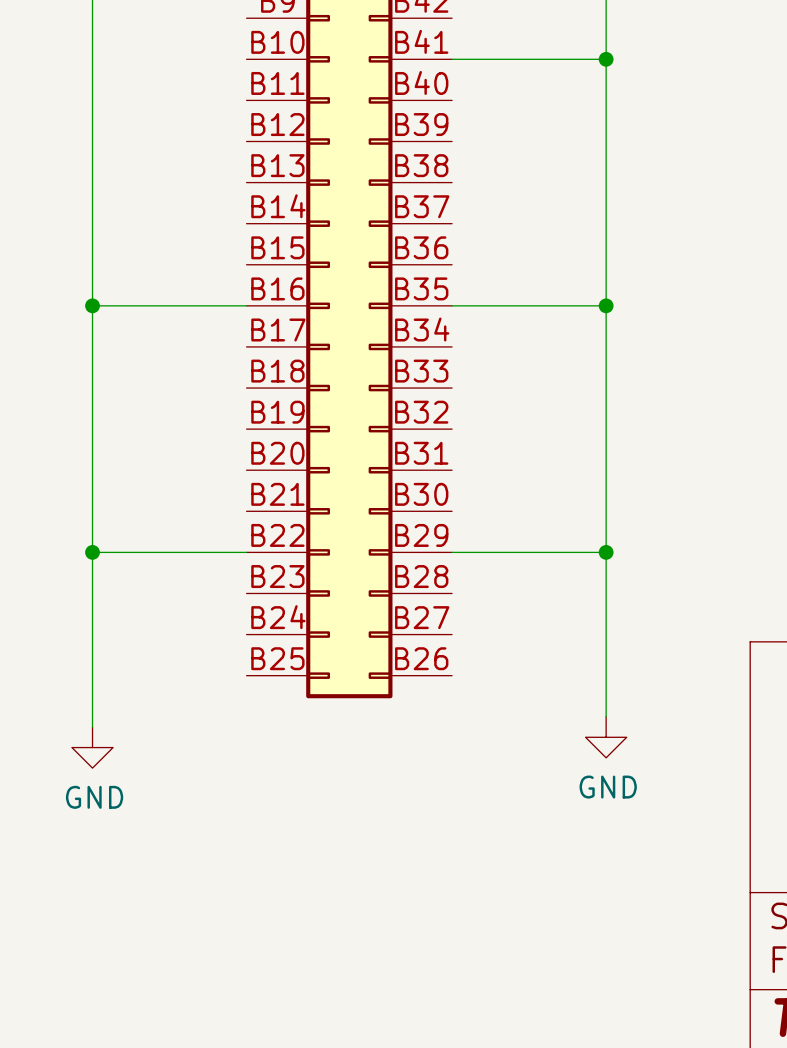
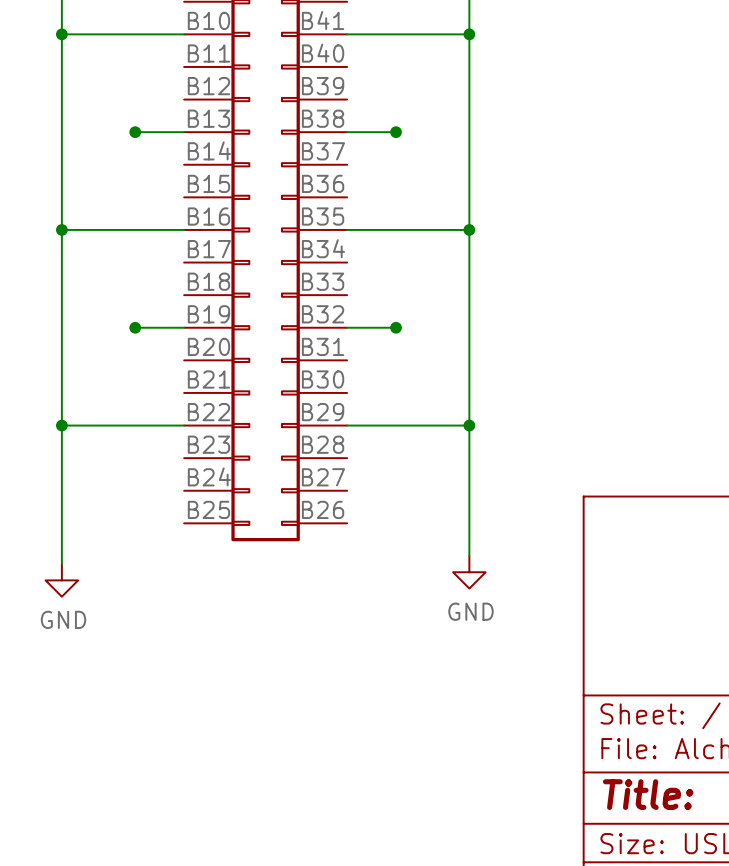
wire: none -> (61, 34) (184, 34)
junction: none -> (61, 34)
wire: none -> (135, 132) (184, 132)
junction: none -> (135, 132)
wire: none -> (347, 132) (396, 132)
junction: none -> (396, 132)
wire: none -> (135, 327) (184, 327)
junction: none -> (135, 327)
wire: none -> (347, 327) (396, 327)
junction: none -> (396, 327)

